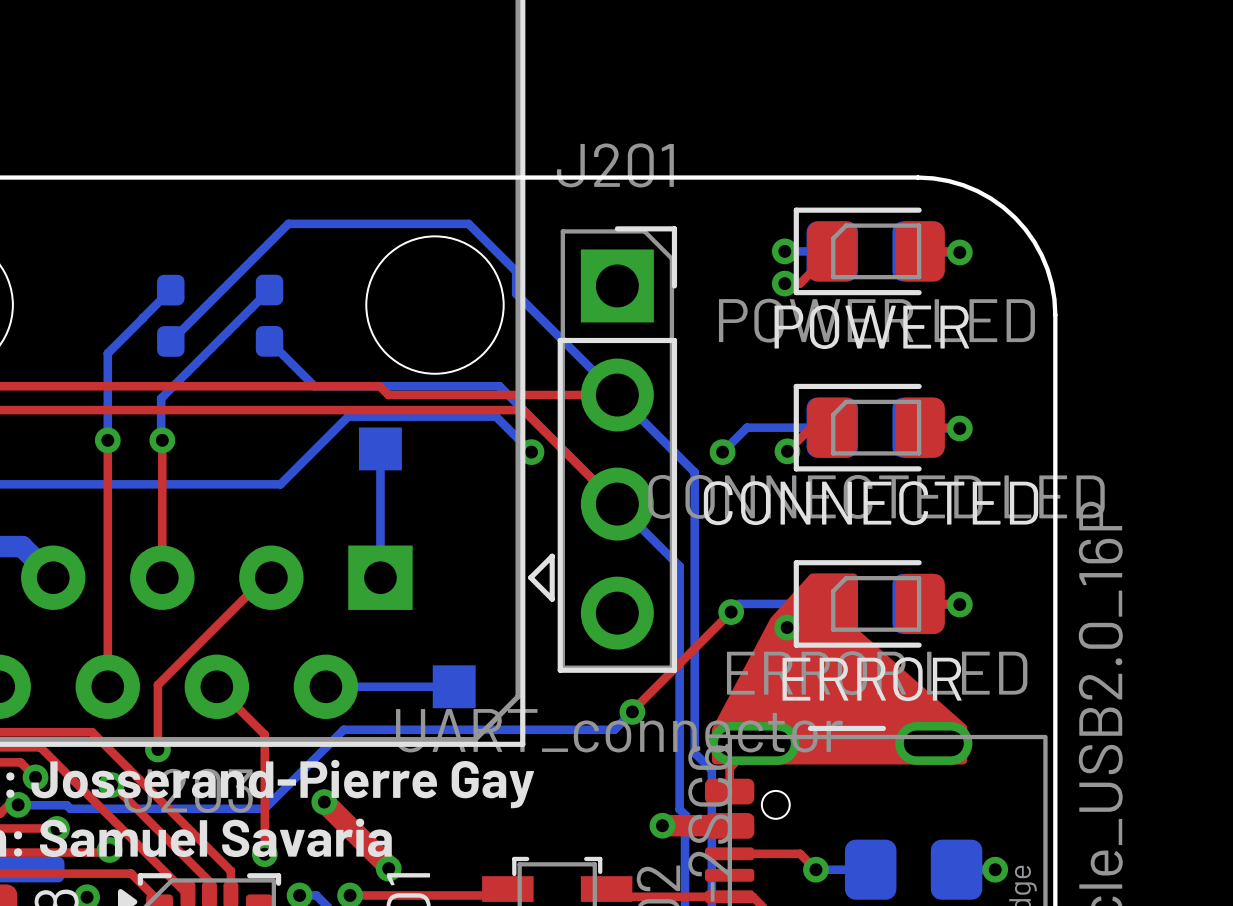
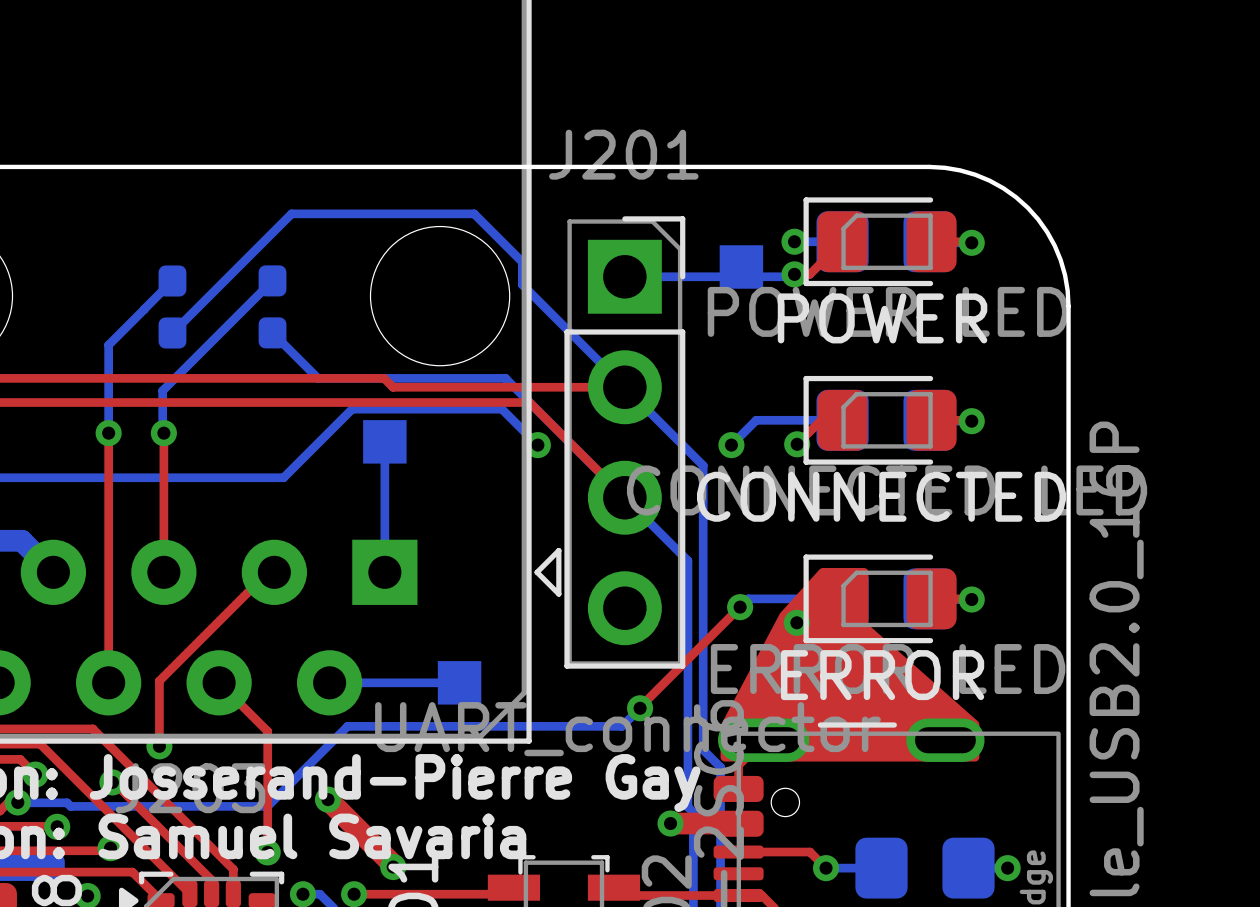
part: none -> (741, 266)
bottom track: none -> (794, 274) (792, 276) (624, 276)

